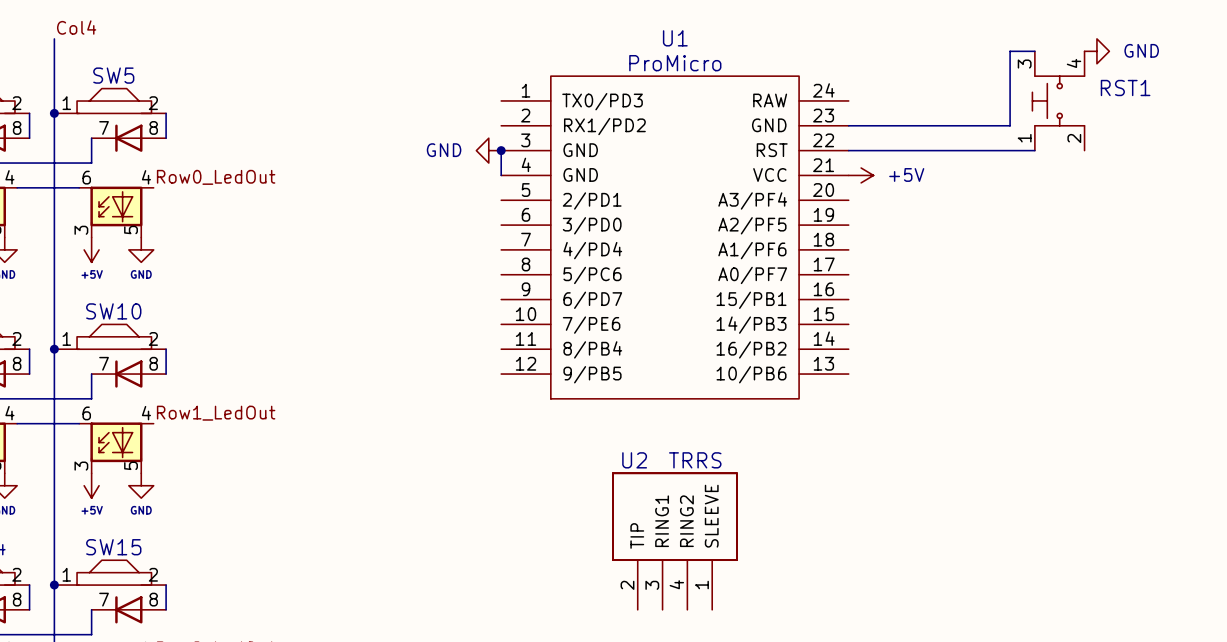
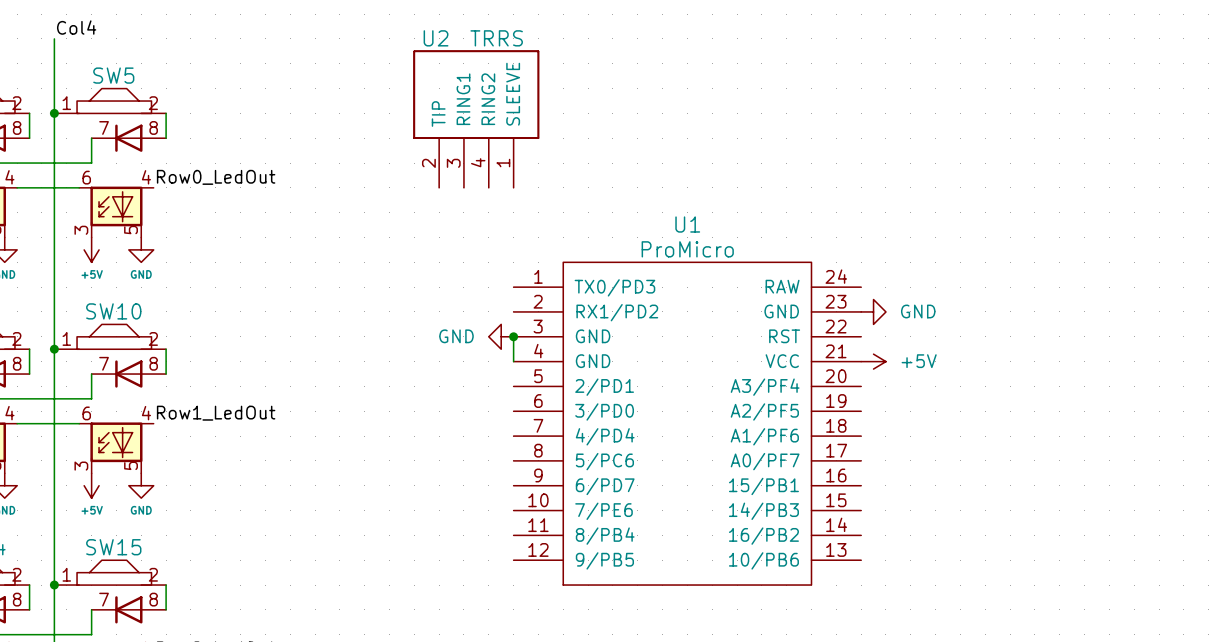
wire: (1034, 51) (1010, 51) (1010, 125) (848, 125) -> none
power symbol: GND (1096, 51) -> none
RST1: (1058, 100) -> none
power symbol position: GND (488, 150) -> GND (501, 336)
wire: (501, 150) (501, 175) -> (513, 336) (513, 361)
junction: (501, 150) -> none
wire: (848, 150) (1034, 150) -> none
power symbol position: +5V (861, 175) -> +5V (873, 361)
U1 position: (674, 237) -> (687, 423)
power symbol: none -> GND (873, 311)
junction: none -> (513, 336)
U2 position: (674, 541) -> (476, 119)

